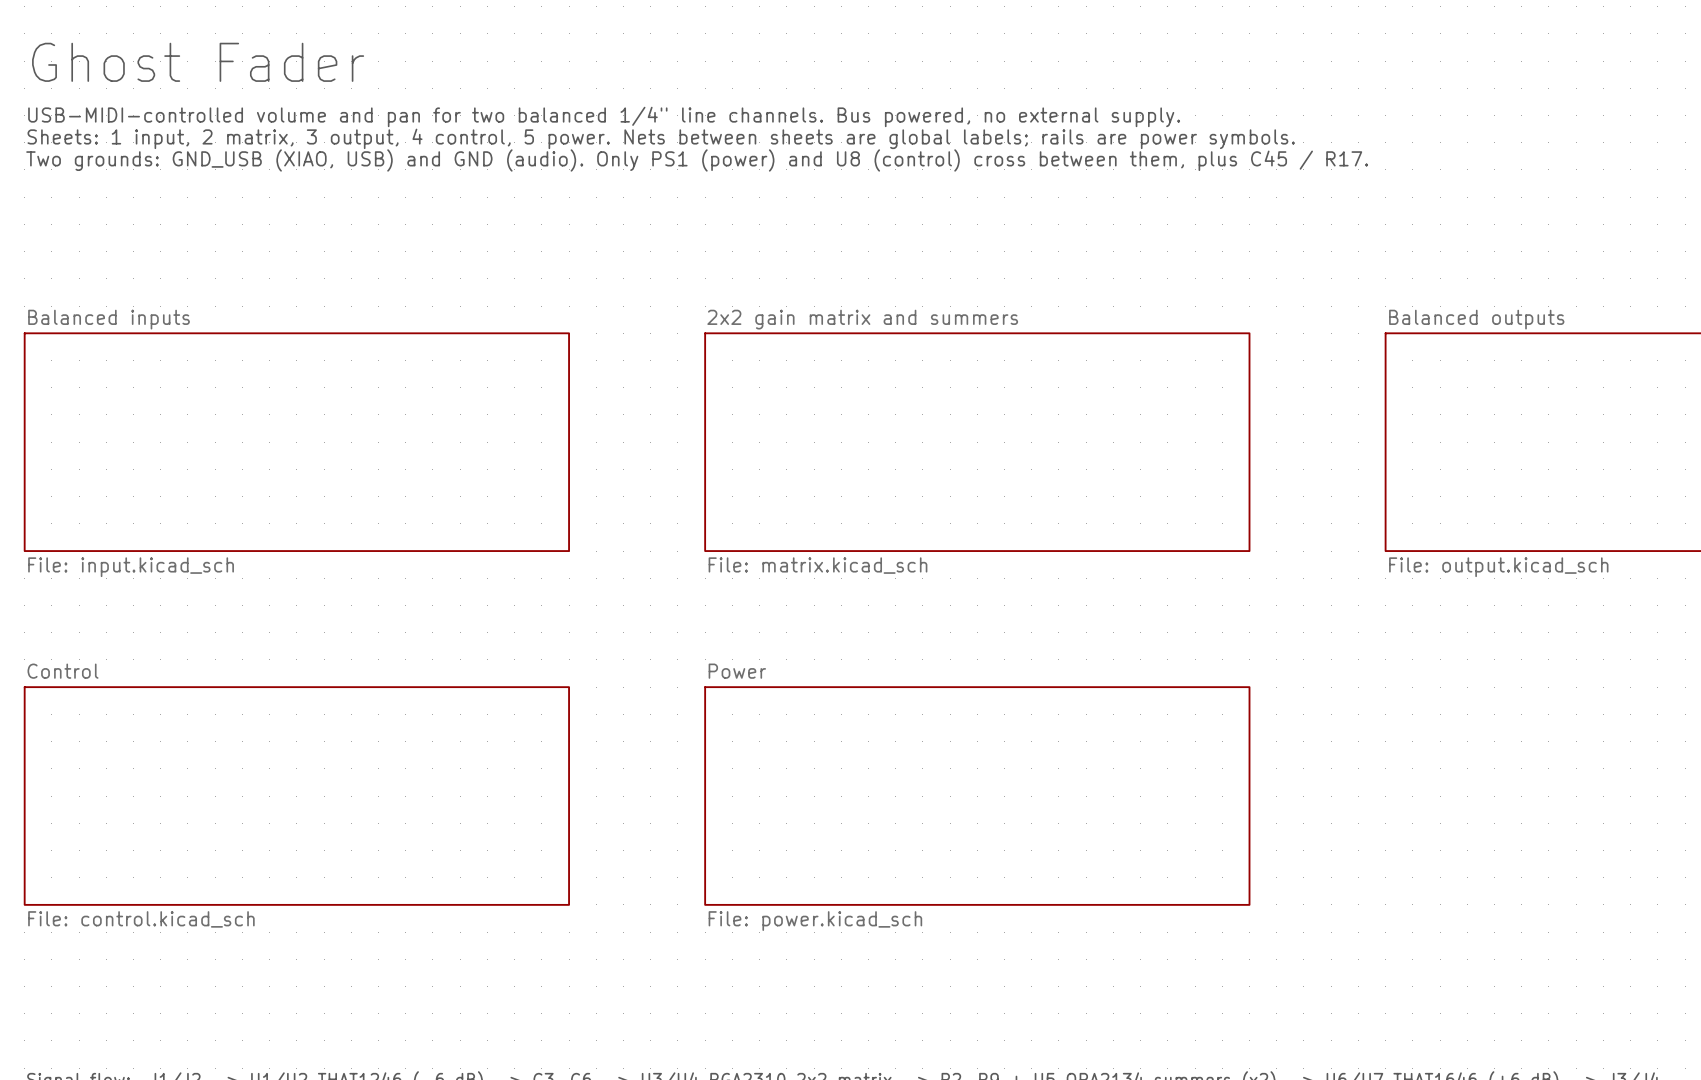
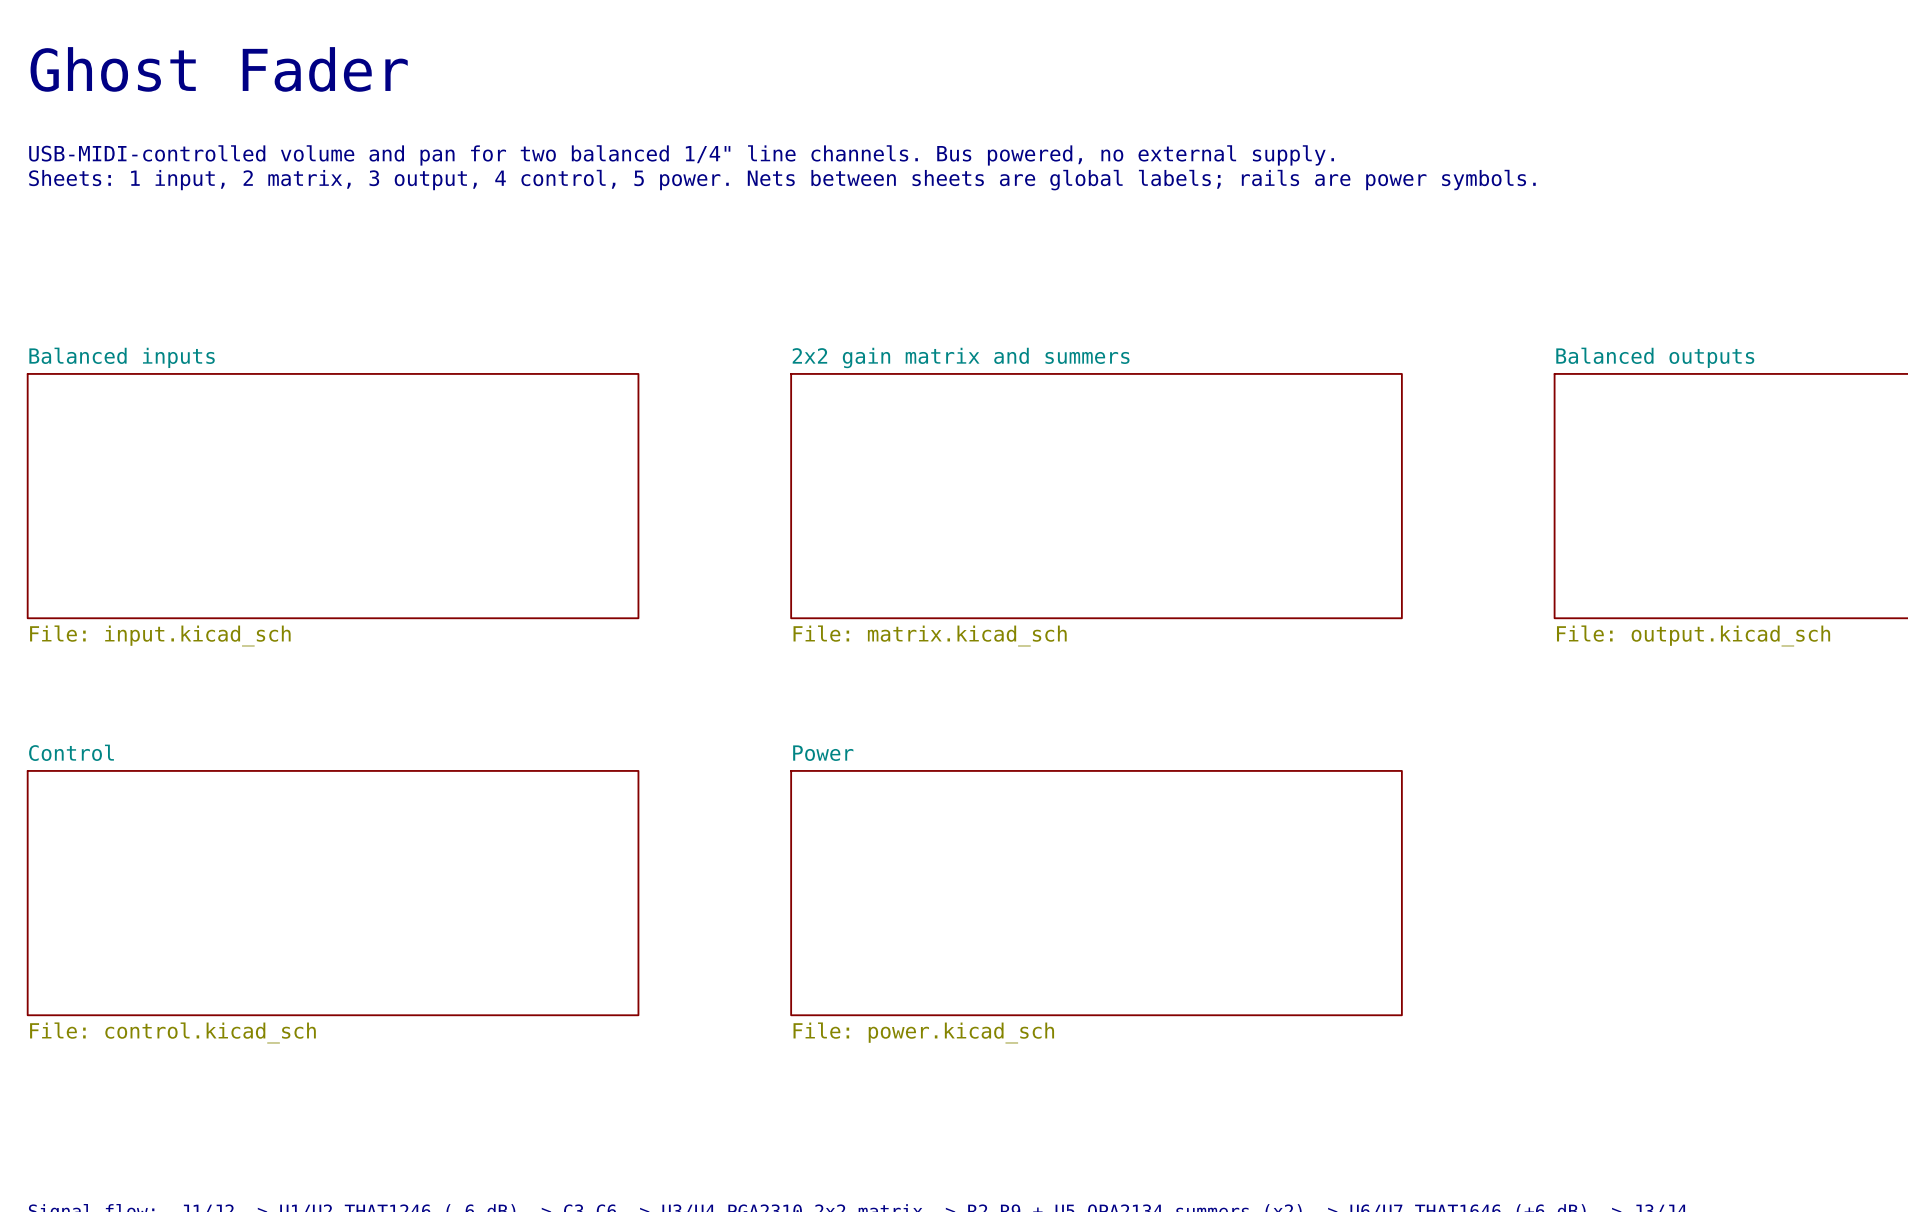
text: USB-MIDI-controlled volume and pan for two balanced 1/4" line channels. Bus powered, no external supply. (604, 116) -> none
text: Sheets: 1 input, 2 matrix, 3 output, 4 control, 5 power. Nets between sheets are global labels; rails are power symbols. (661, 138) -> USB-MIDI-controlled volume and pan for two balanced 1/4" line channels. Bus powered, no external supply. (681, 155)
text: Two grounds: GND_USB (XIAO, USB) and GND (audio). Only PS1 (power) and U8 (control) cross between them, plus C45 / R17. (697, 160) -> Sheets: 1 input, 2 matrix, 3 output, 4 control, 5 power. Nets between sheets are global labels; rails are power symbols. (782, 180)

